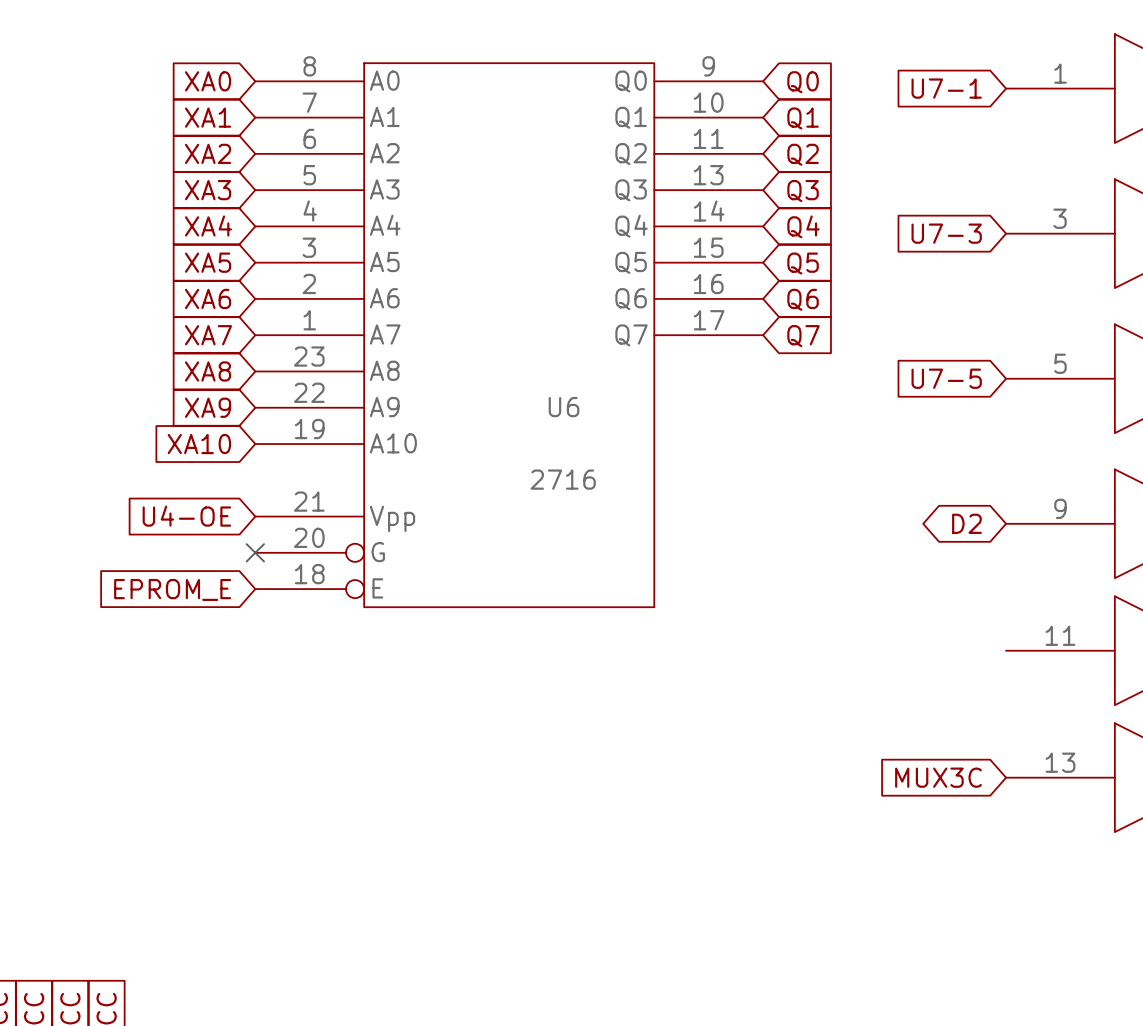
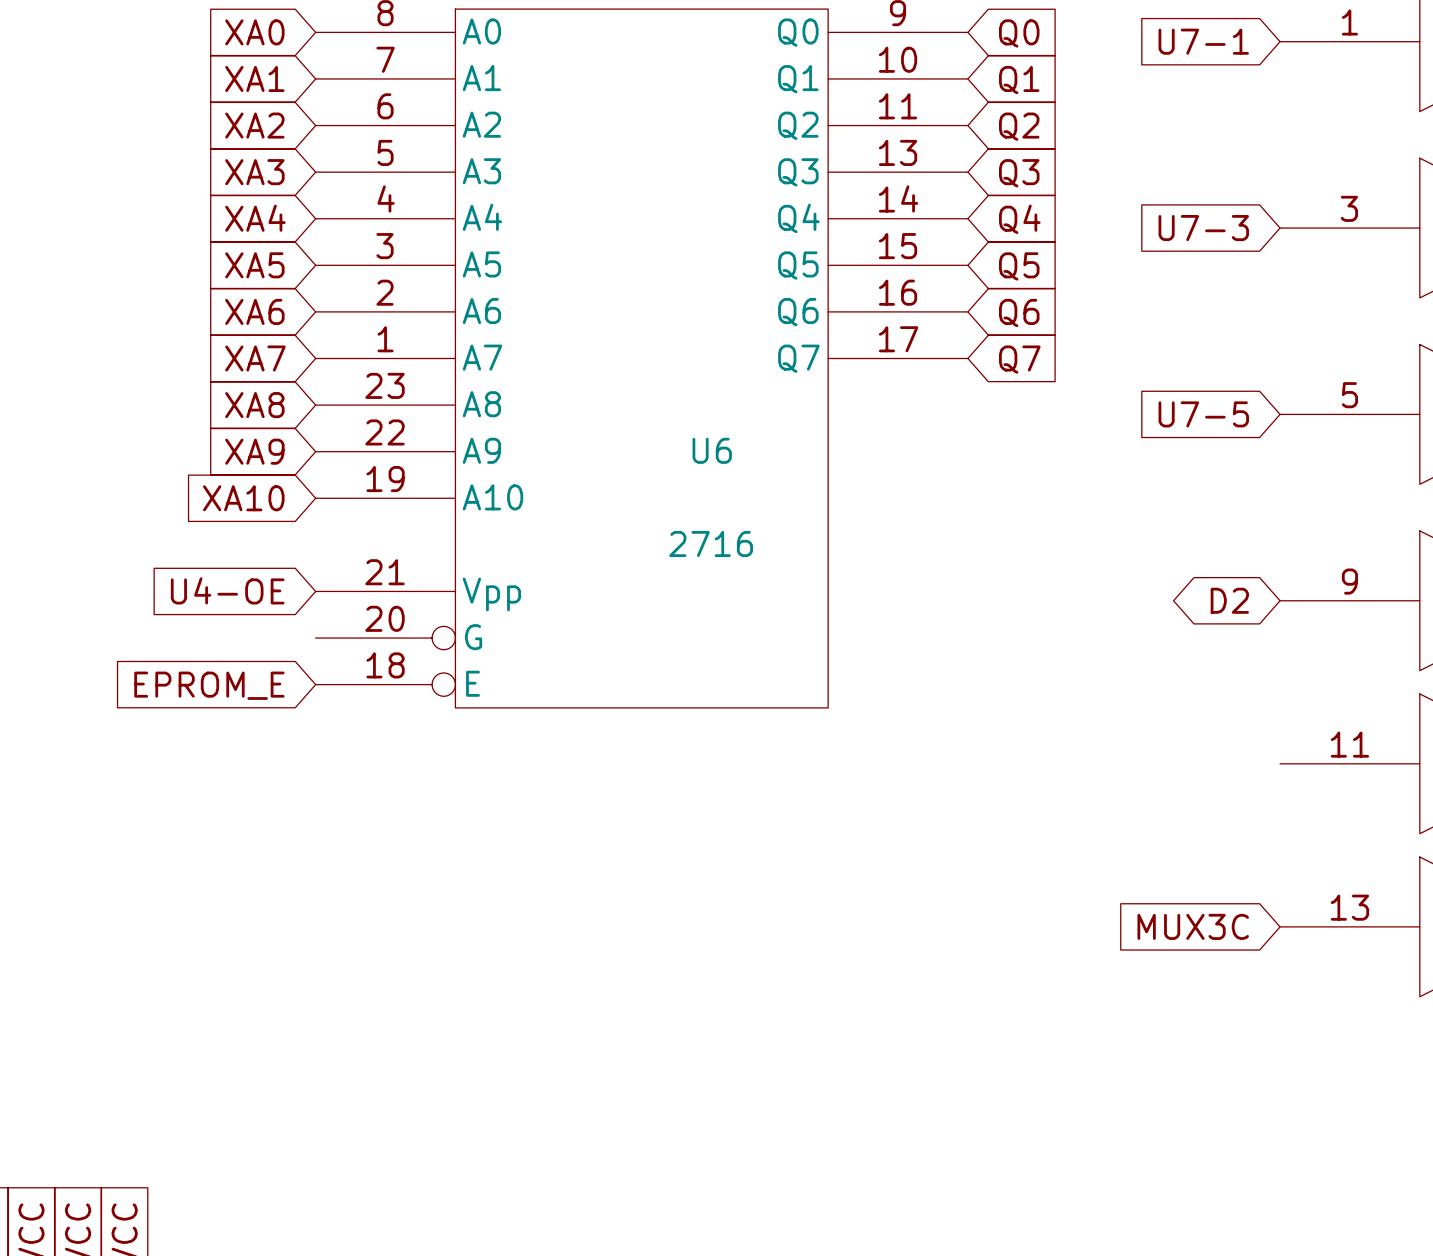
no-connect mark: (255, 552) -> none

